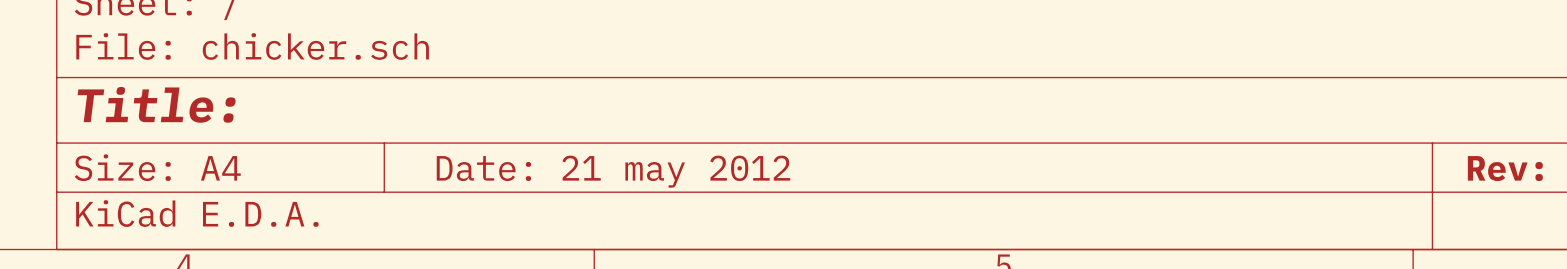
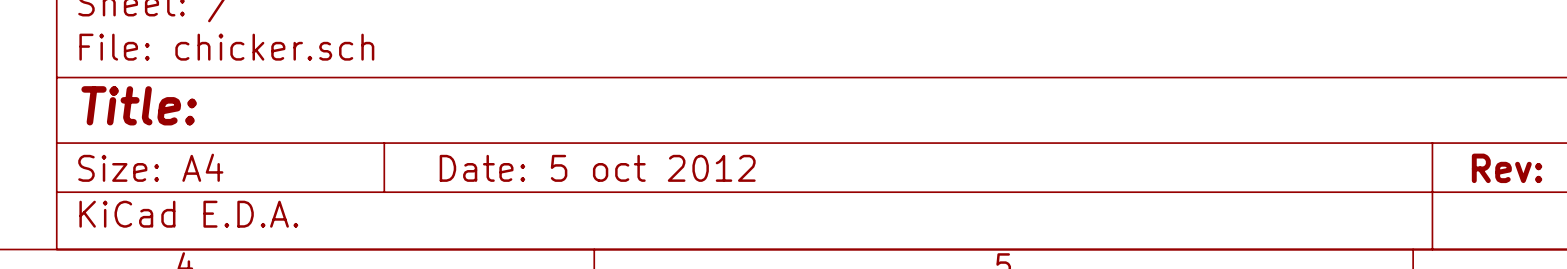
title block: Date: 21 may 2012 (613, 171) -> Date: 5 oct 2012 (597, 168)

